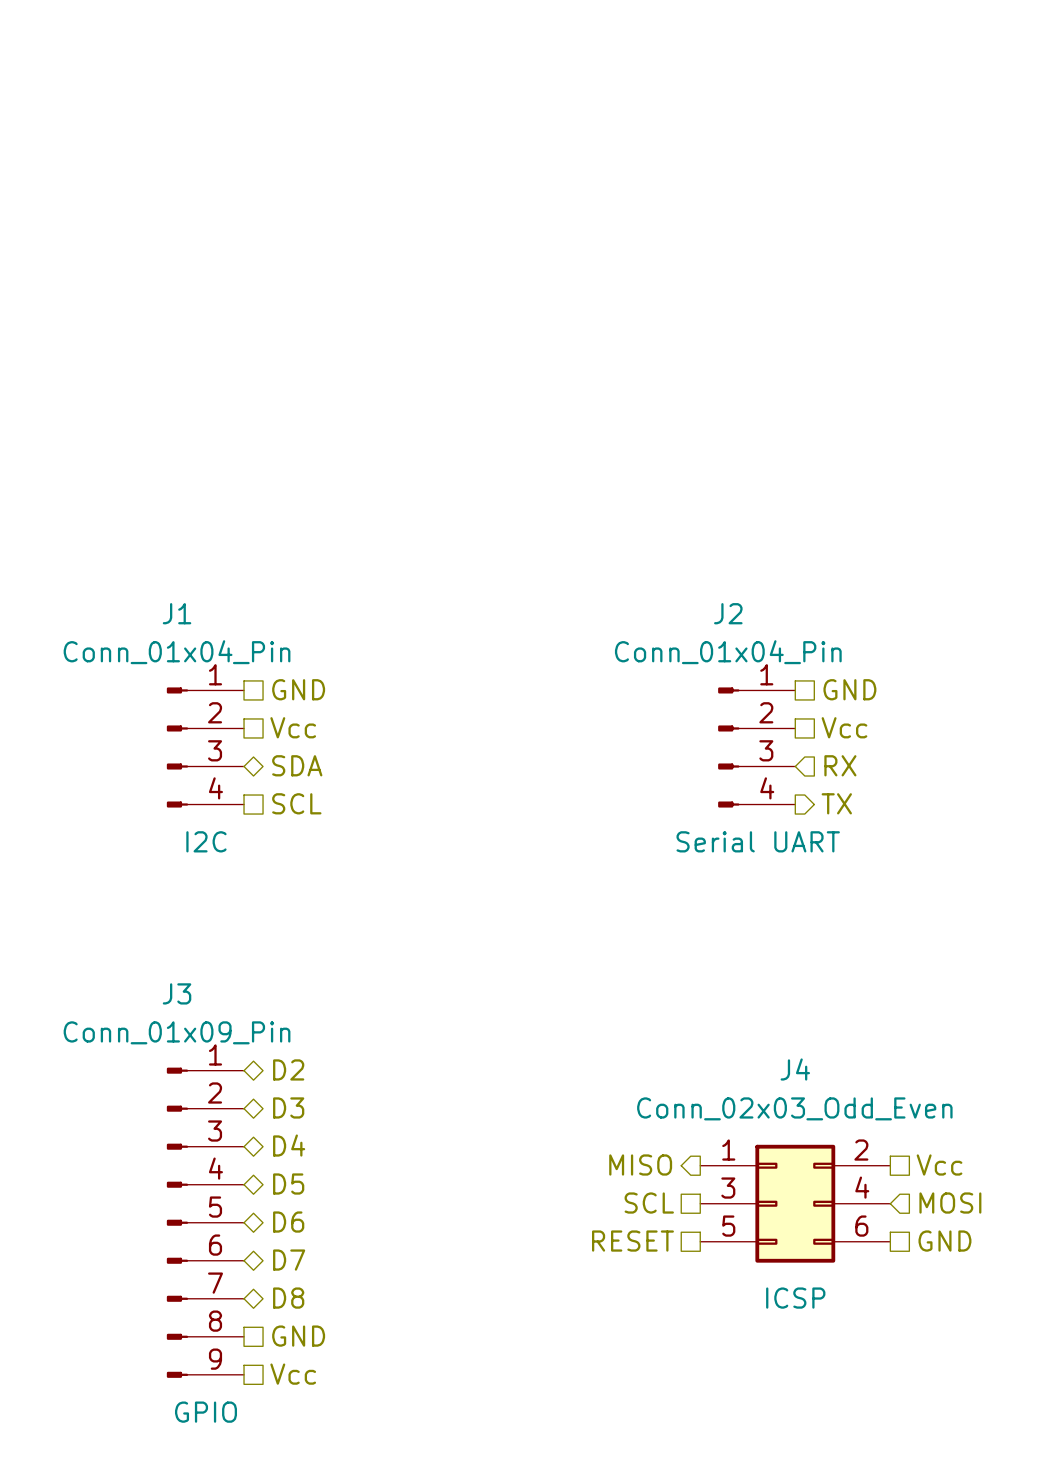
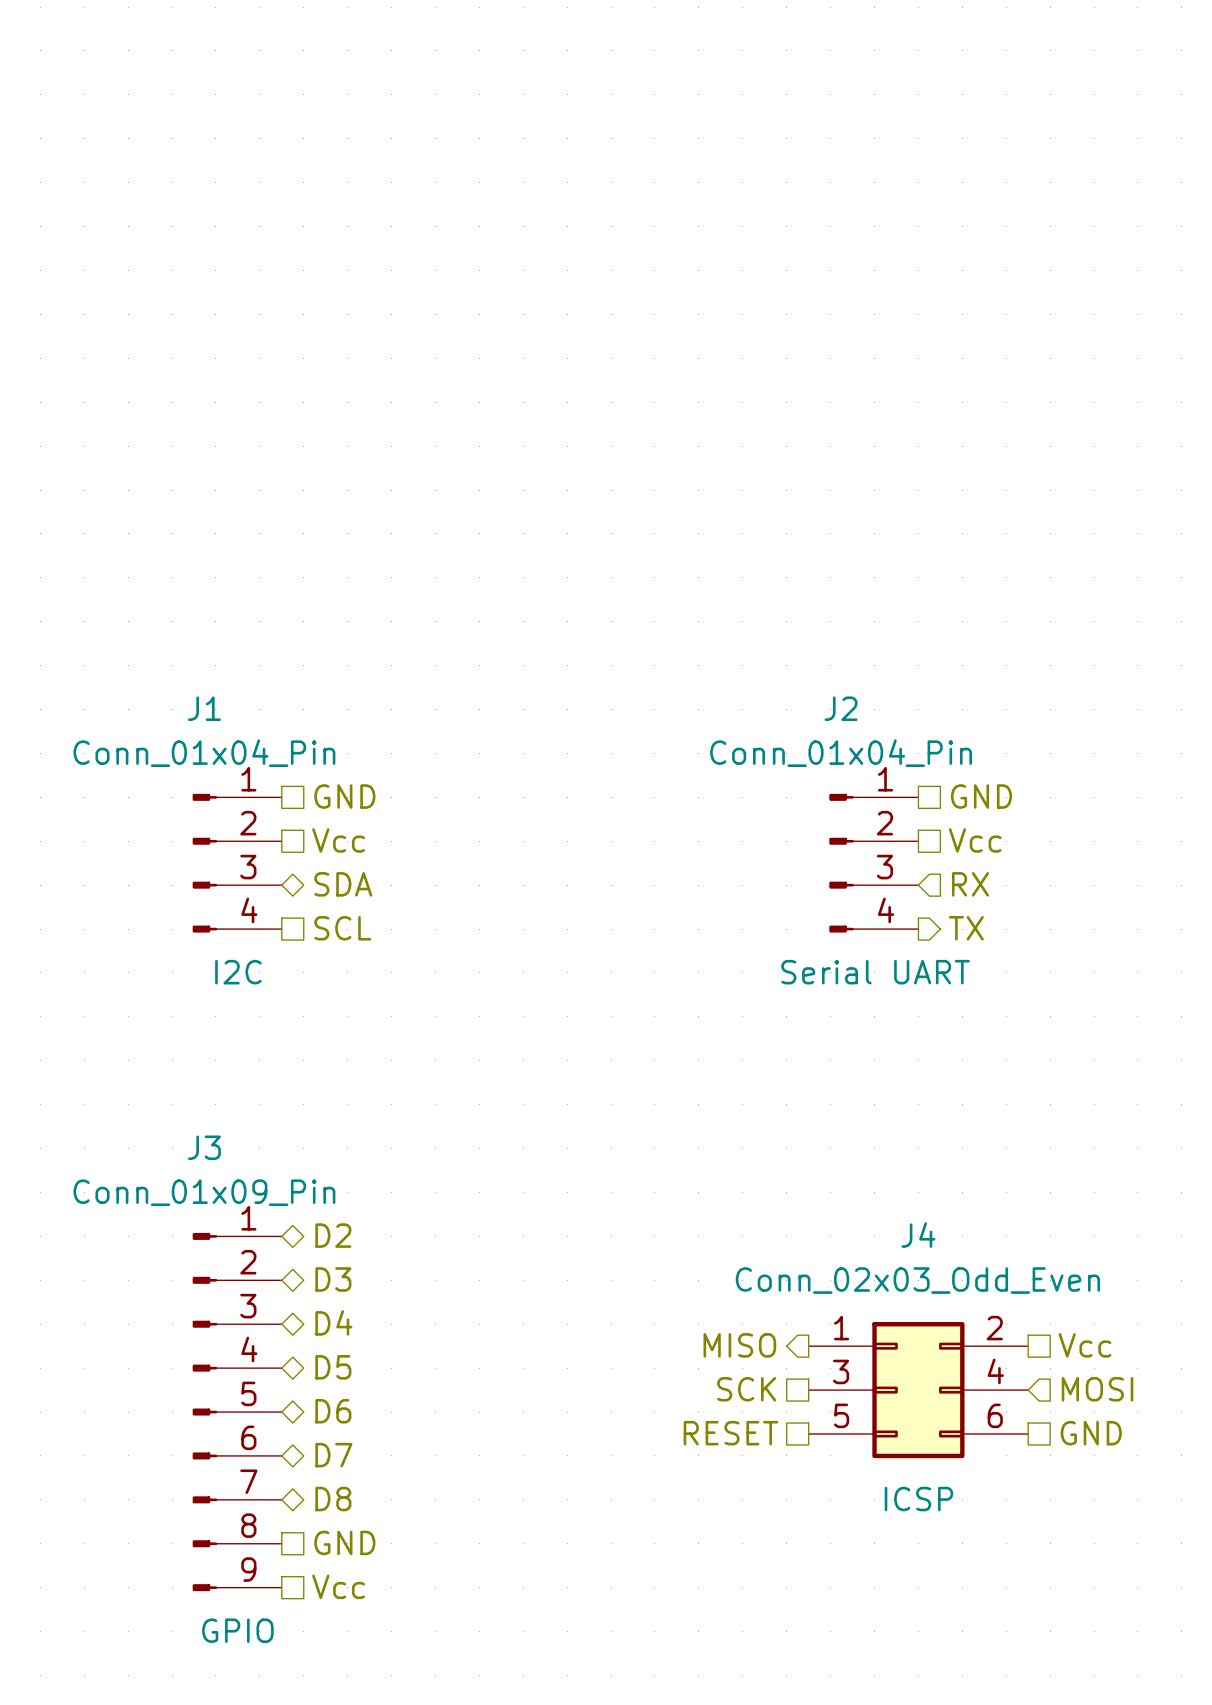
hierarchical label: SCL (649, 1203) -> SCK (746, 1389)

